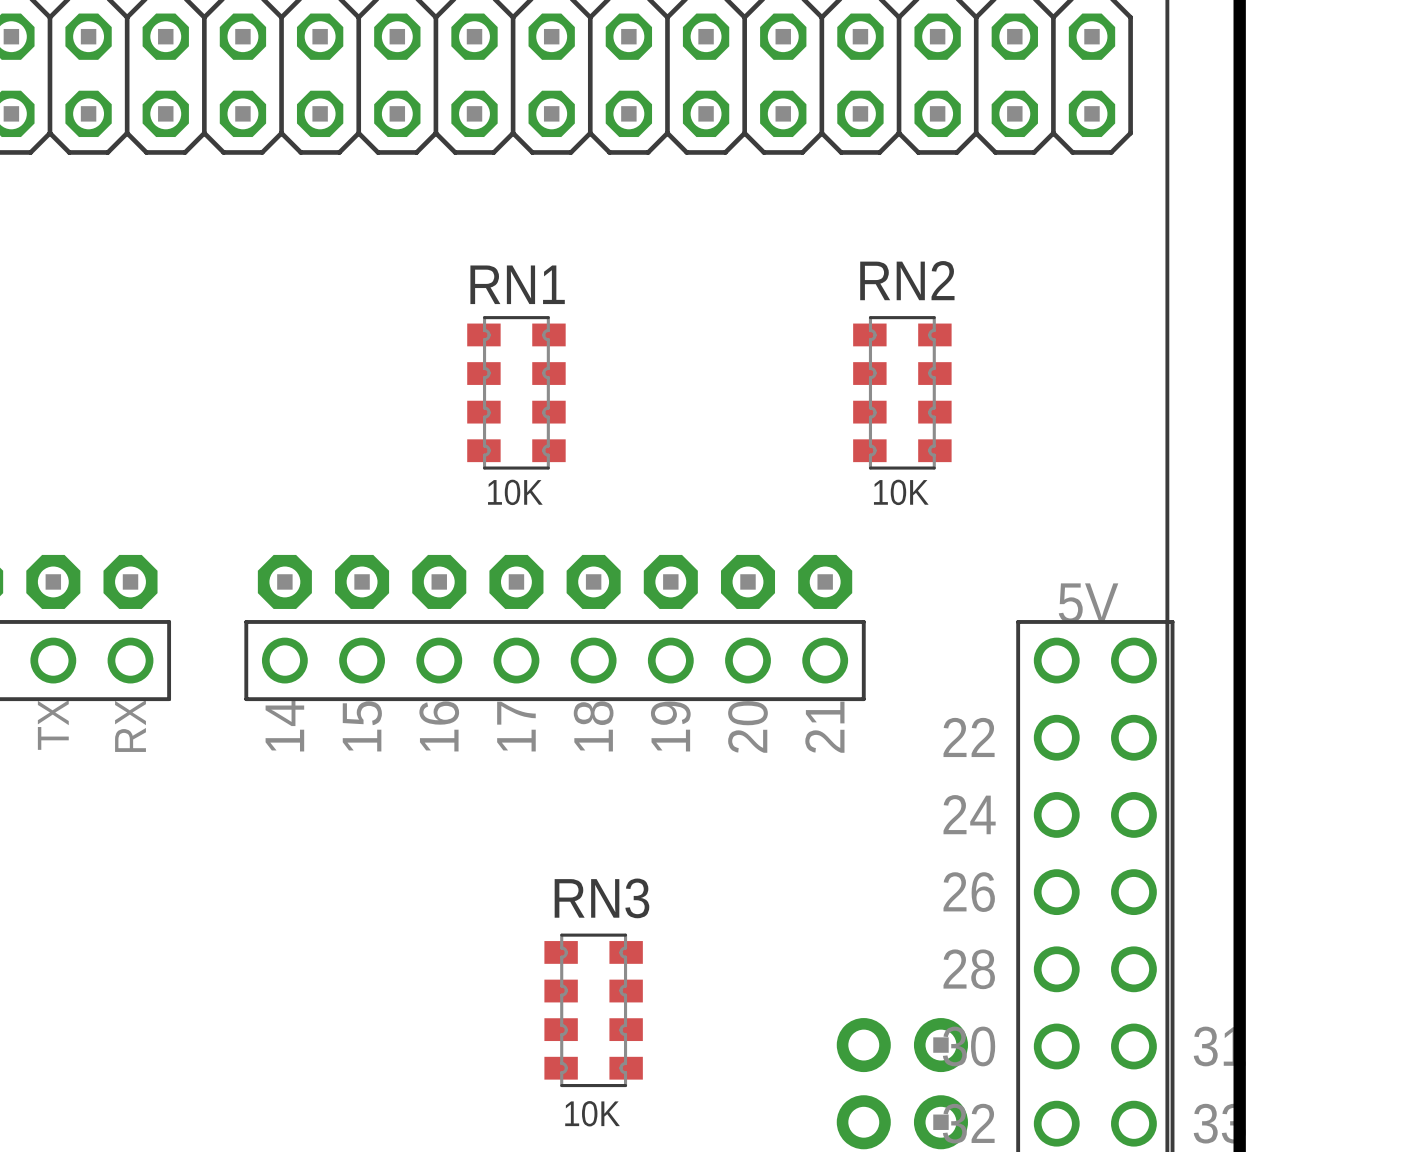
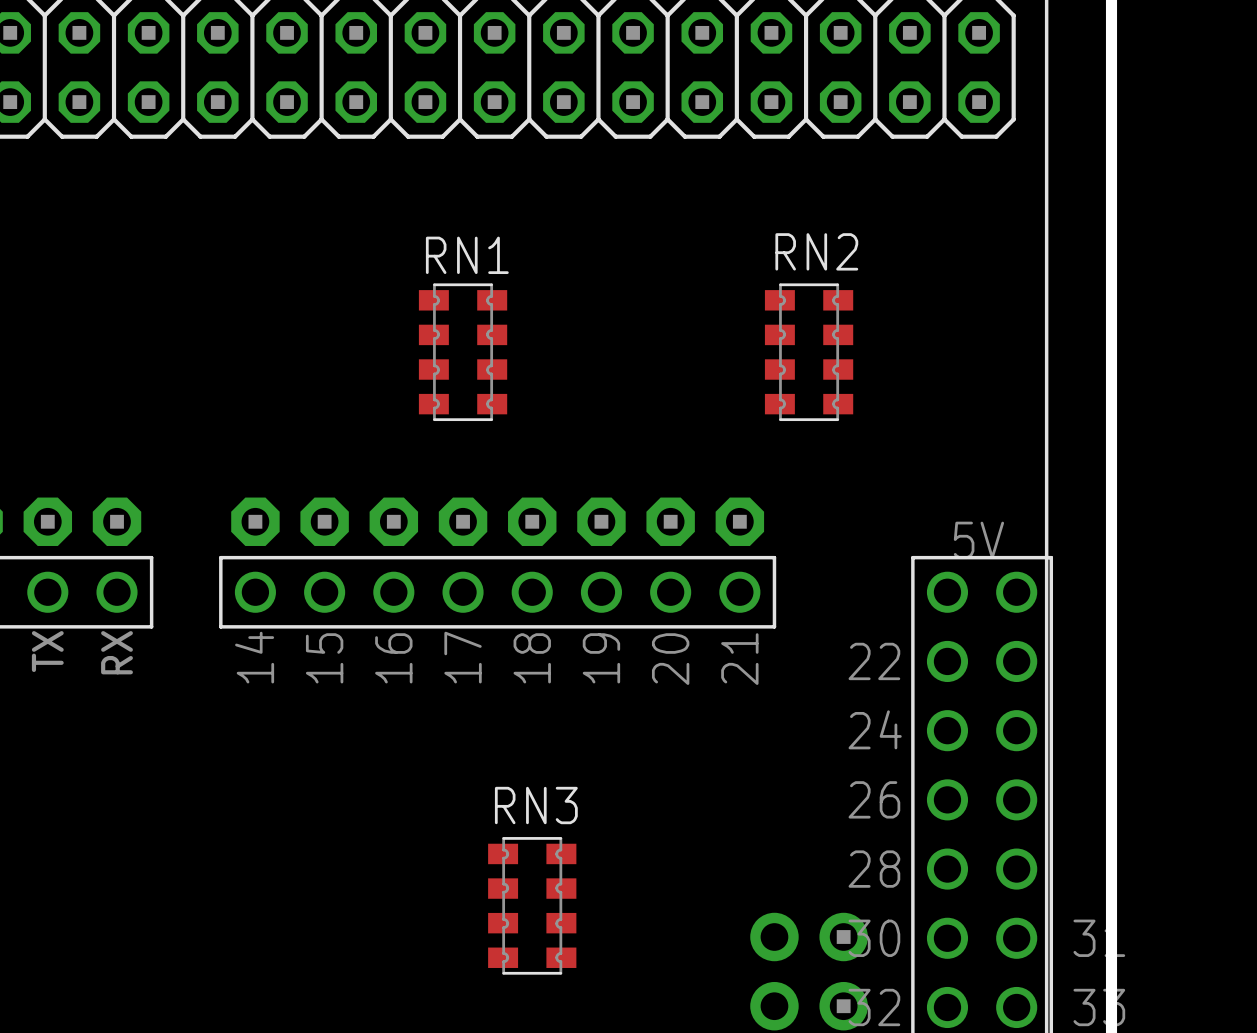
text: 10K (515, 492) -> none
text: 10K (901, 492) -> none
text: 10K (592, 1113) -> none

